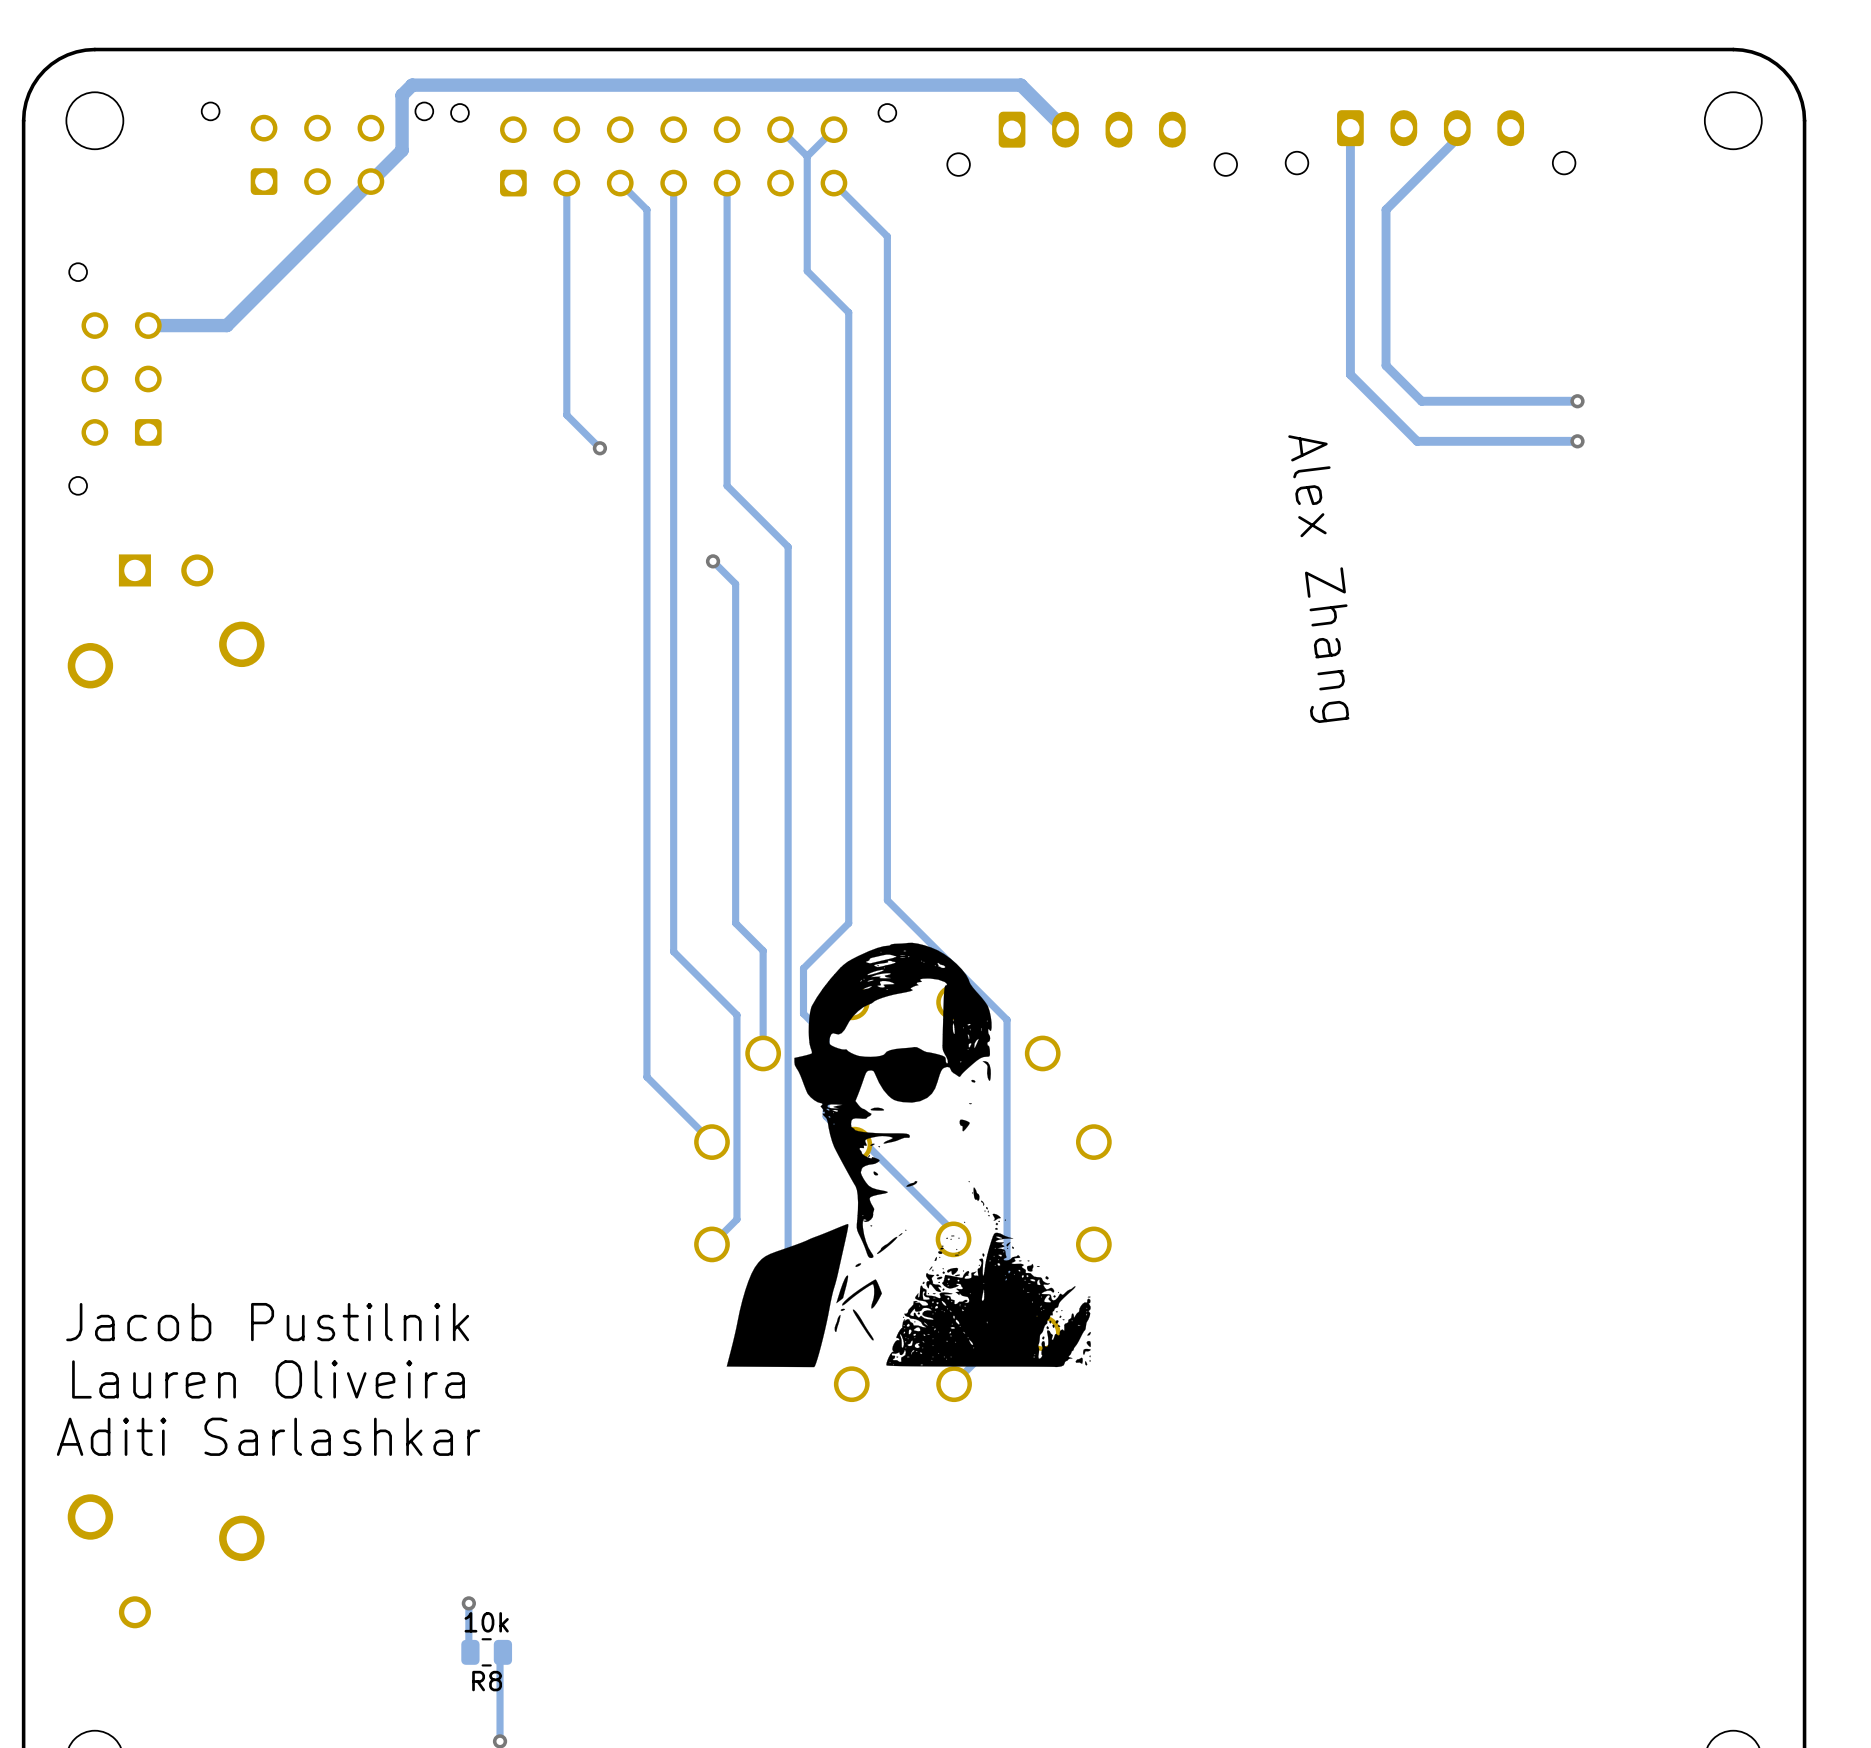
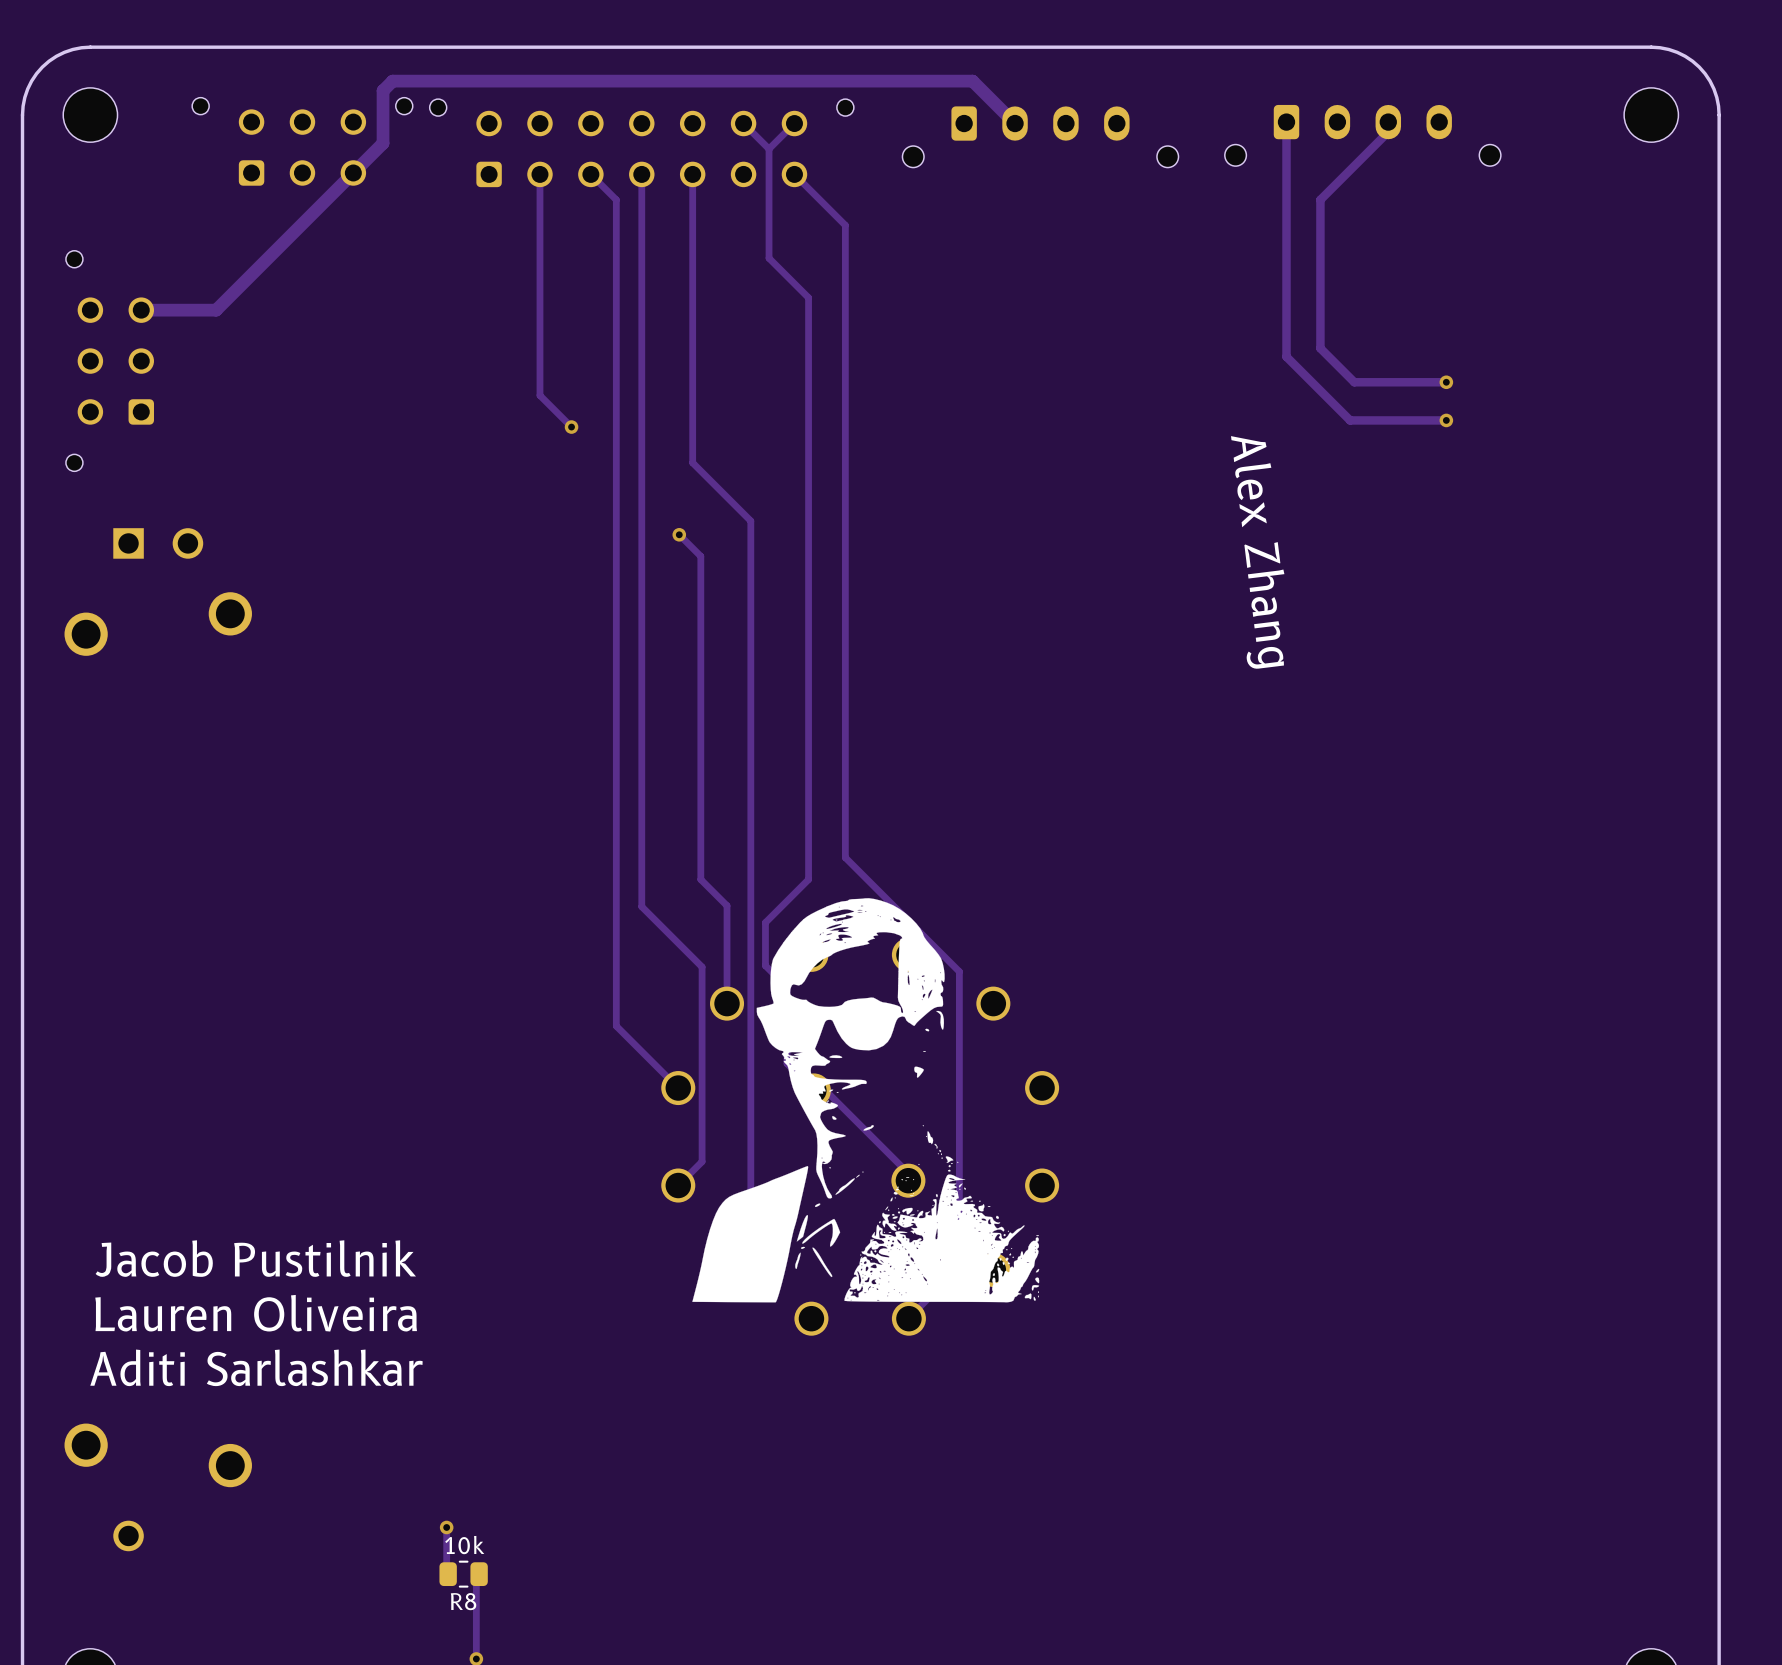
via: none -> (1446, 382)
track: (1577, 401) (1518, 401) -> none
via: (1577, 401) -> none
via: none -> (1446, 420)
track: (1577, 441) (1518, 441) -> none
via: (1577, 441) -> none

